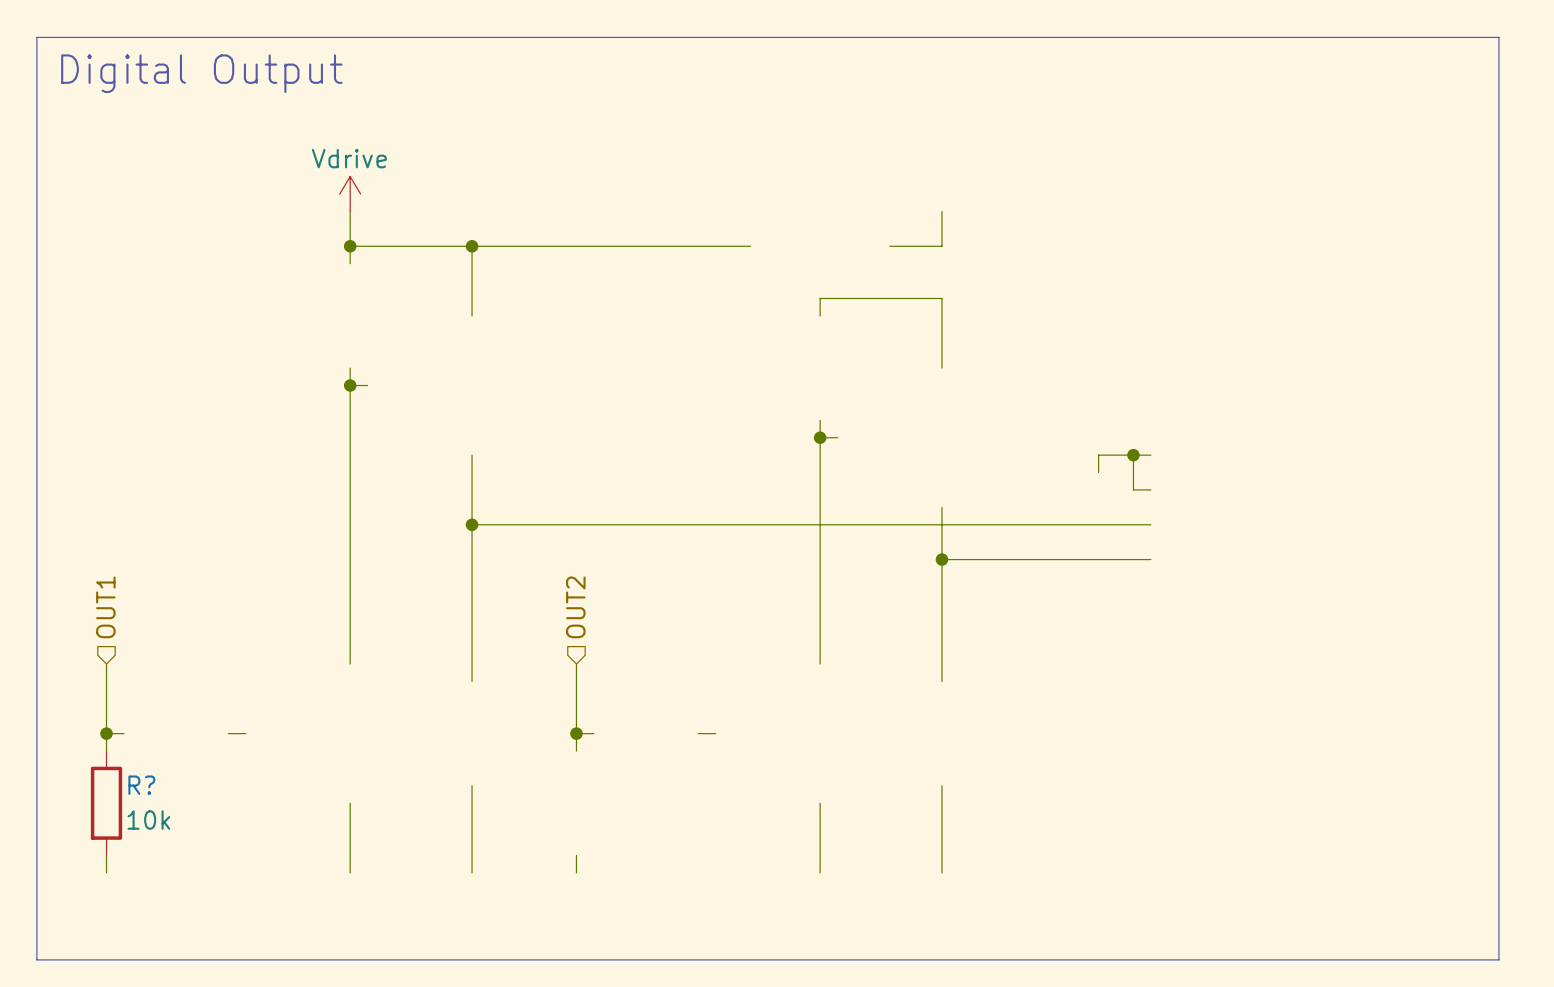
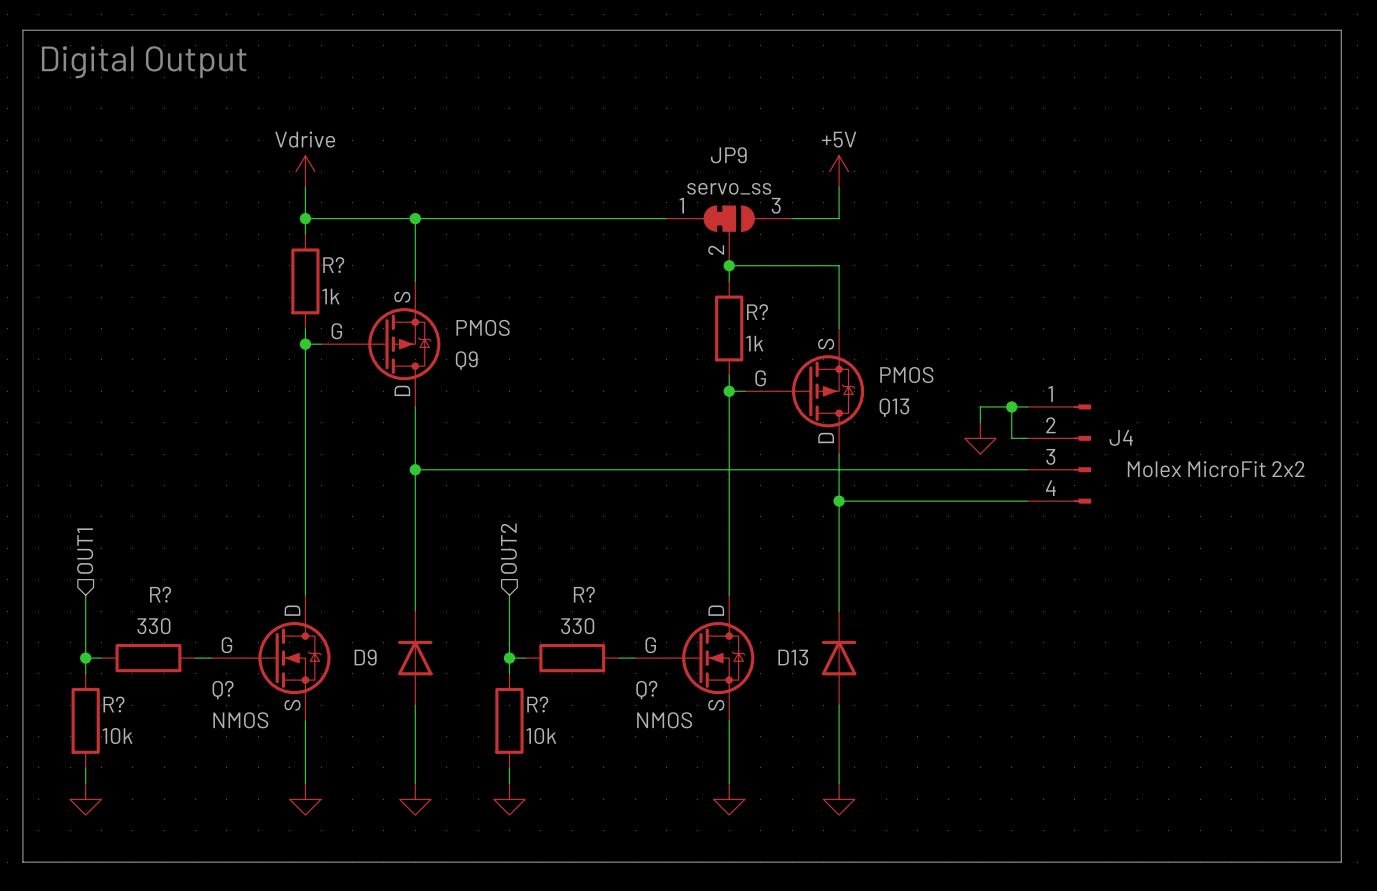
power symbol: none -> +5V (839, 171)
JP9: none -> servo_ss (729, 235)
junction: none -> (729, 265)
R?: none -> 1k (305, 281)
R?: none -> 1k (729, 328)
Q9: none -> PMOS (380, 344)
Q13: none -> PMOS (804, 391)
power symbol: none -> (980, 438)
J4: none -> Molex MicroFit 2x2 (1059, 454)
R?: none -> 330 (148, 658)
Q?: none -> NMOS (270, 658)
D9: none -> (415, 658)
R?: none -> 330 (572, 658)
Q?: none -> NMOS (694, 658)
D13: none -> (839, 658)
R?: none -> 10k (509, 720)
power symbol: none -> (85, 799)
power symbol: none -> (305, 799)
power symbol: none -> (415, 799)
power symbol: none -> (509, 799)
power symbol: none -> (729, 799)
power symbol: none -> (839, 799)

